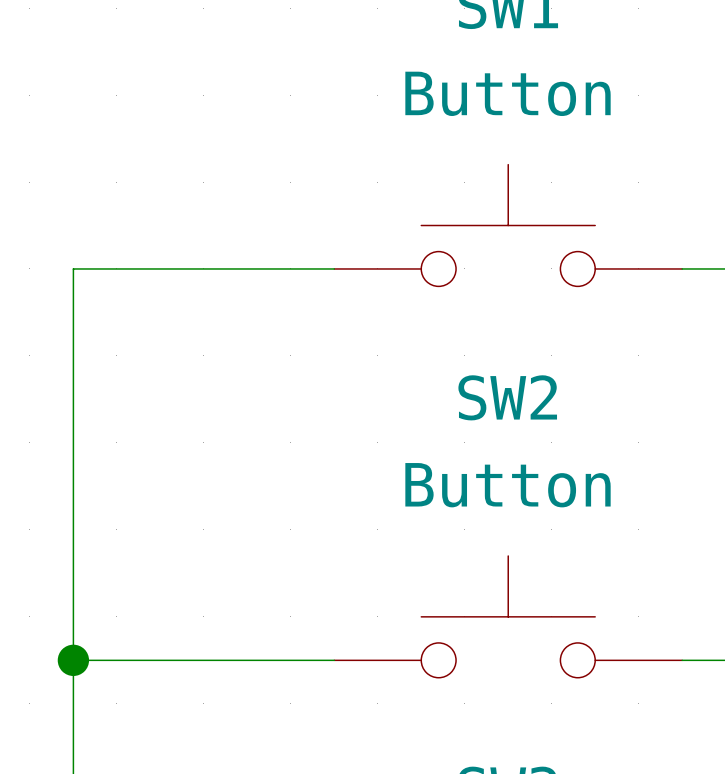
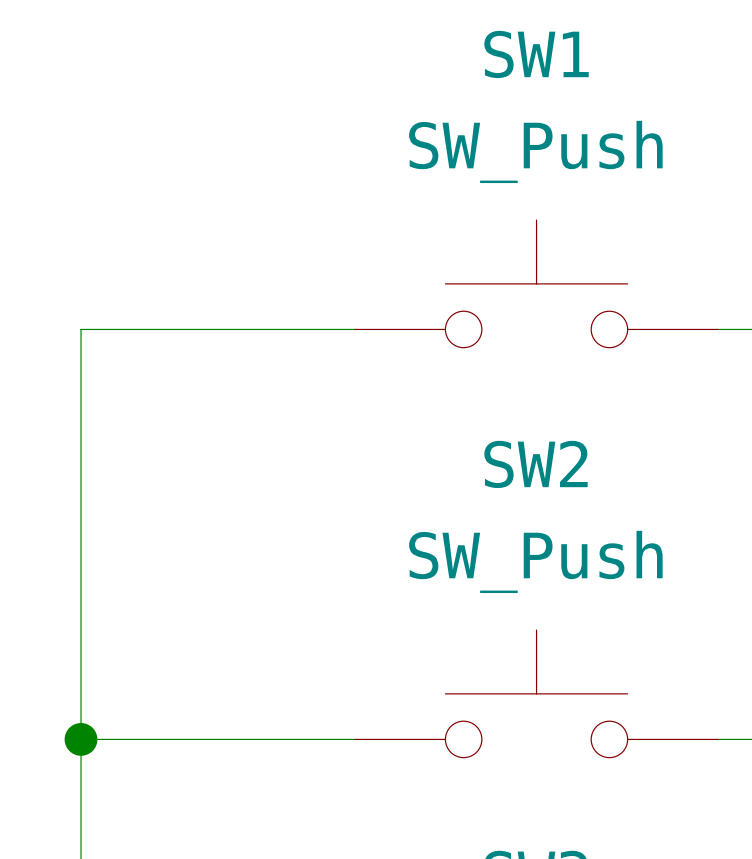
SW1 value: Button (508, 93) -> SW_Push (535, 151)
SW2 value: Button (508, 485) -> SW_Push (535, 561)

